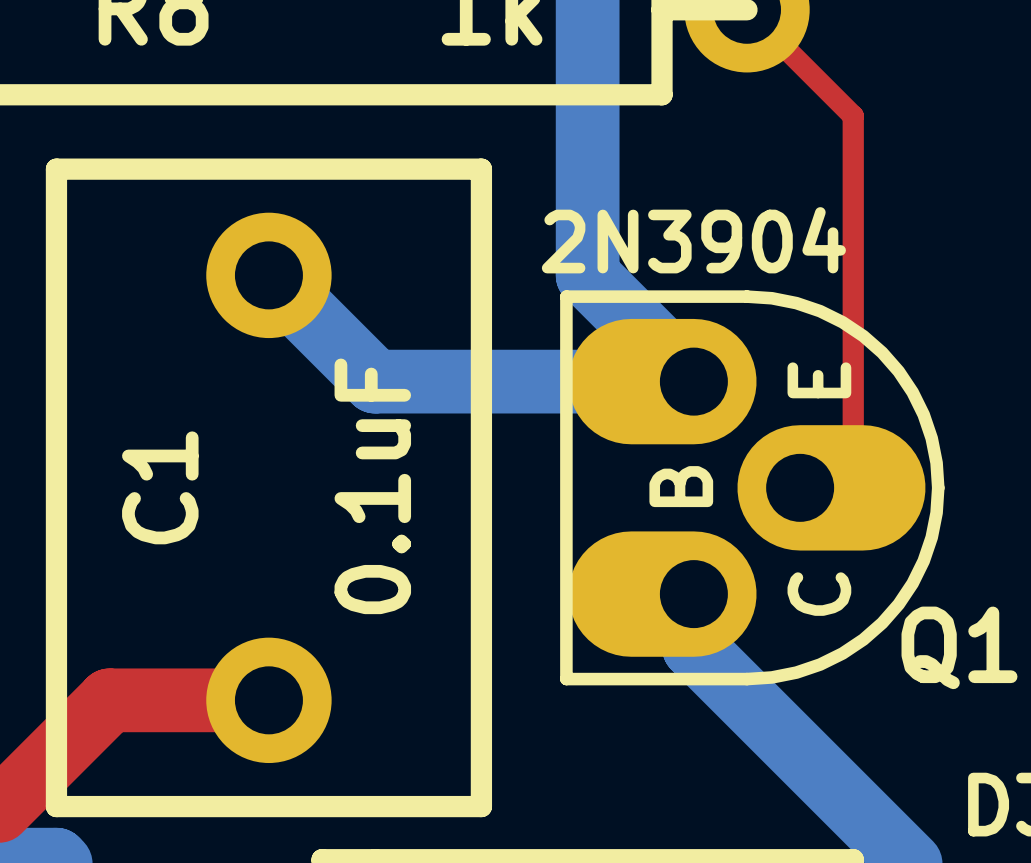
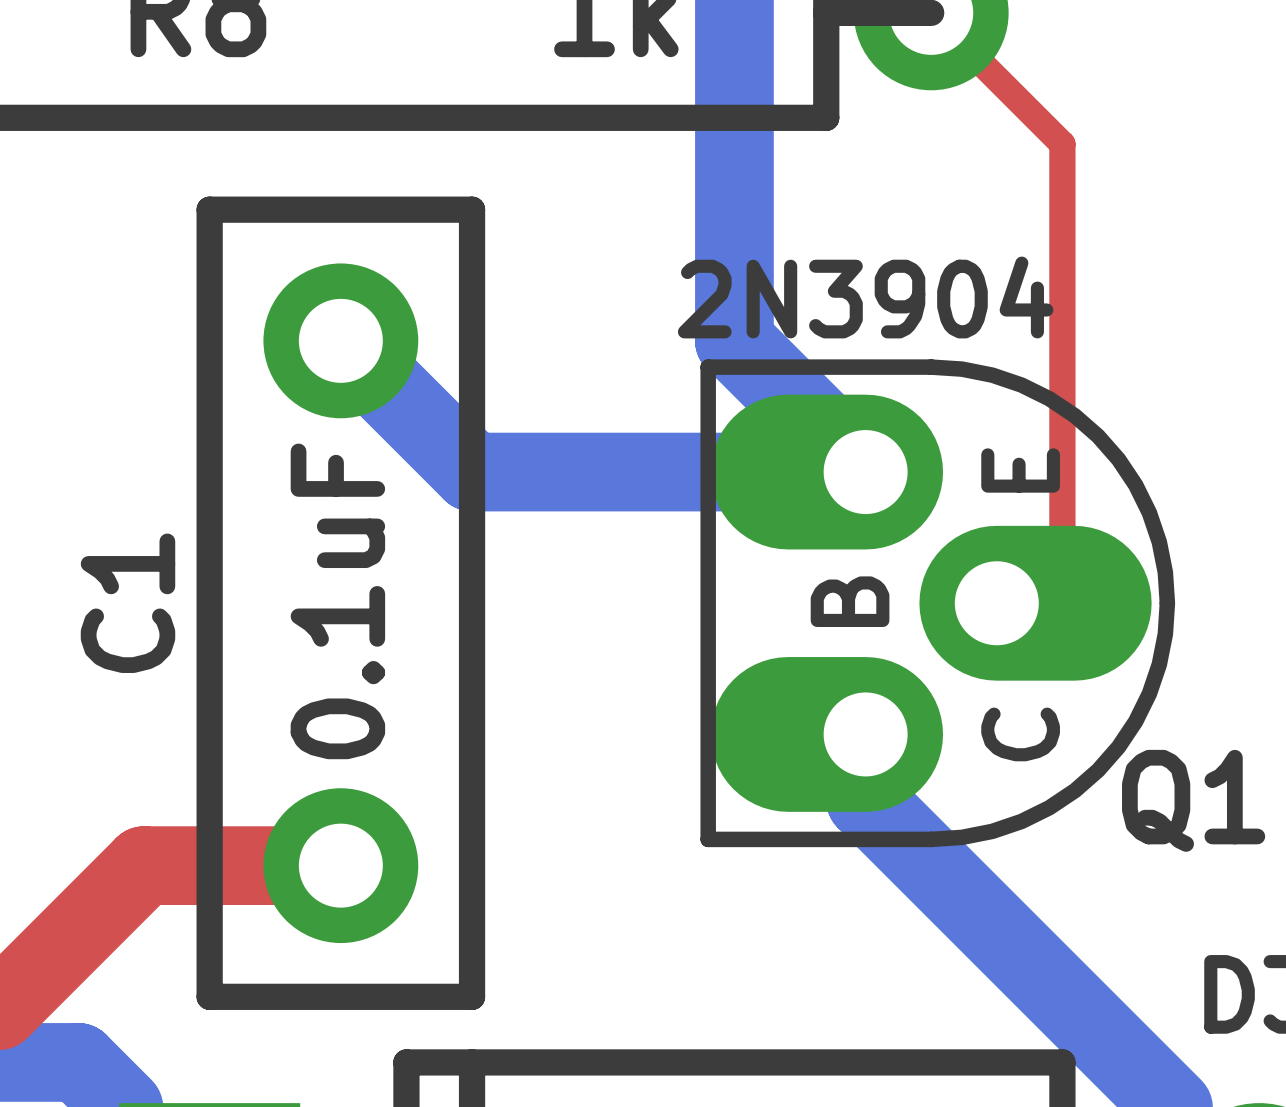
C1 footprint: [45, 158, 493, 818] -> [196, 196, 486, 1010]

